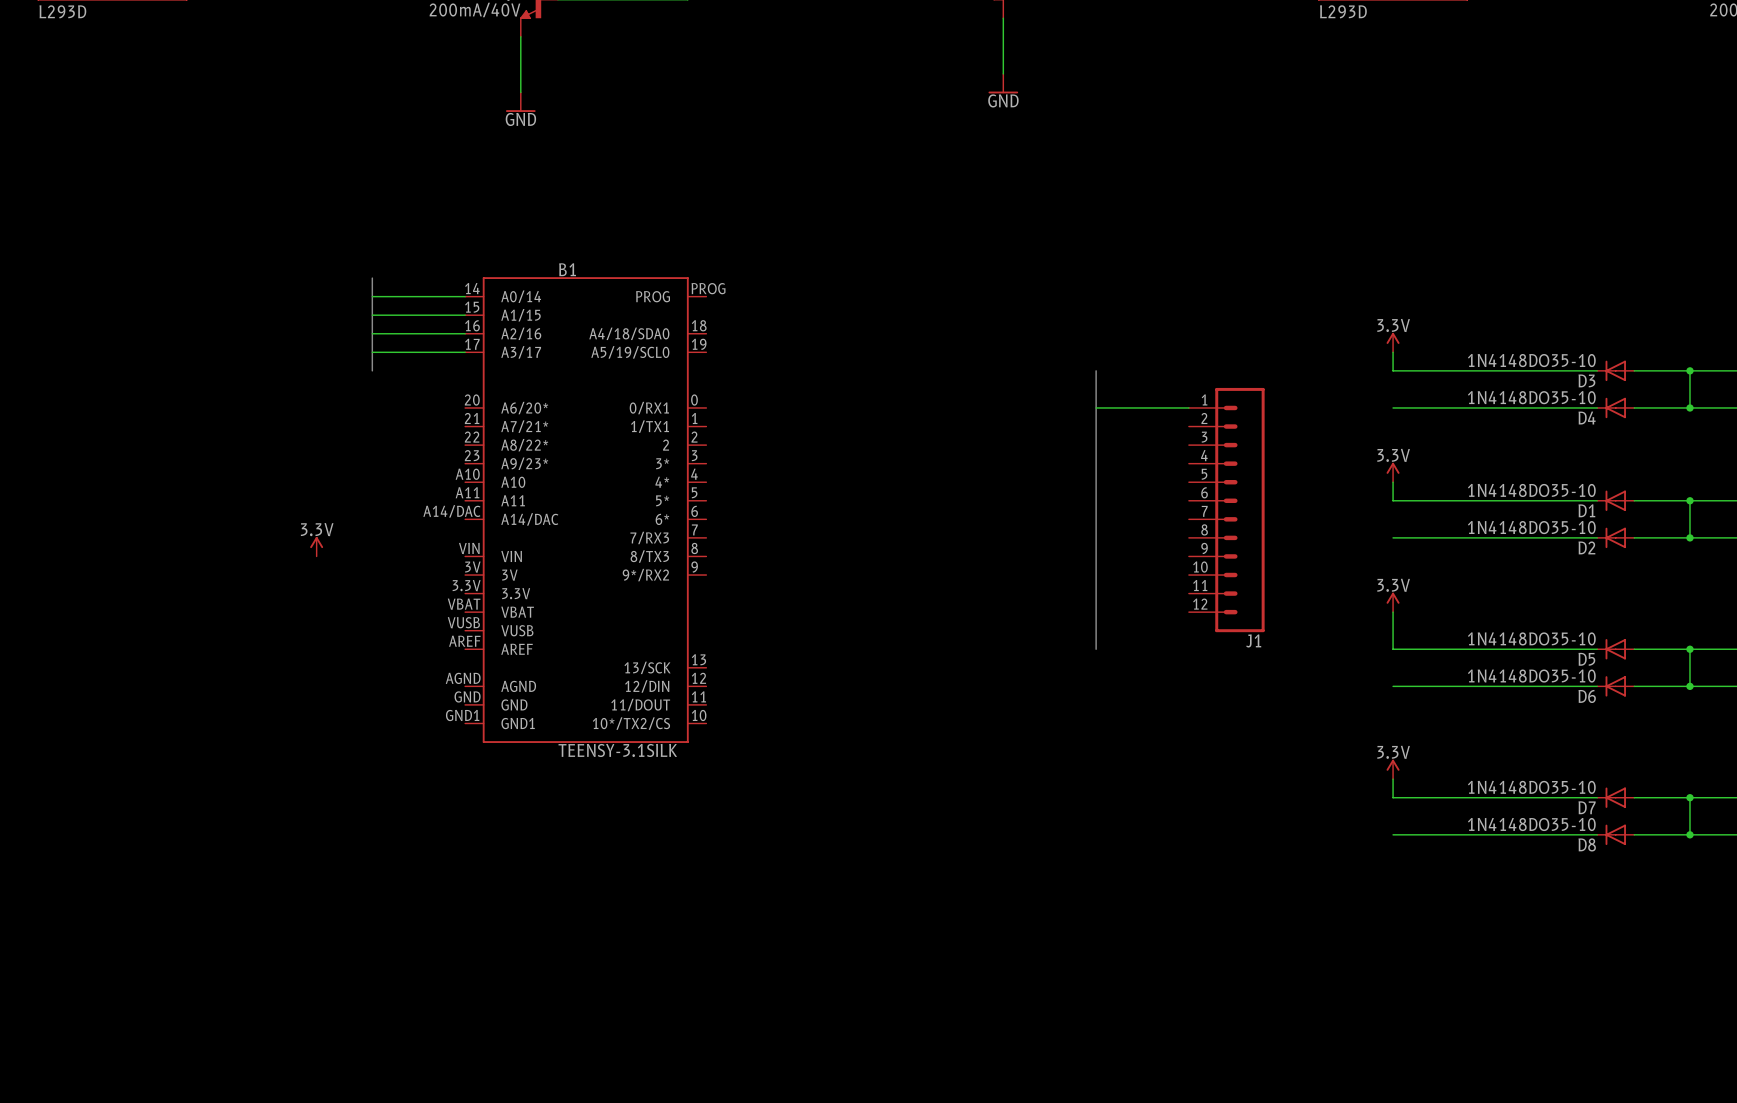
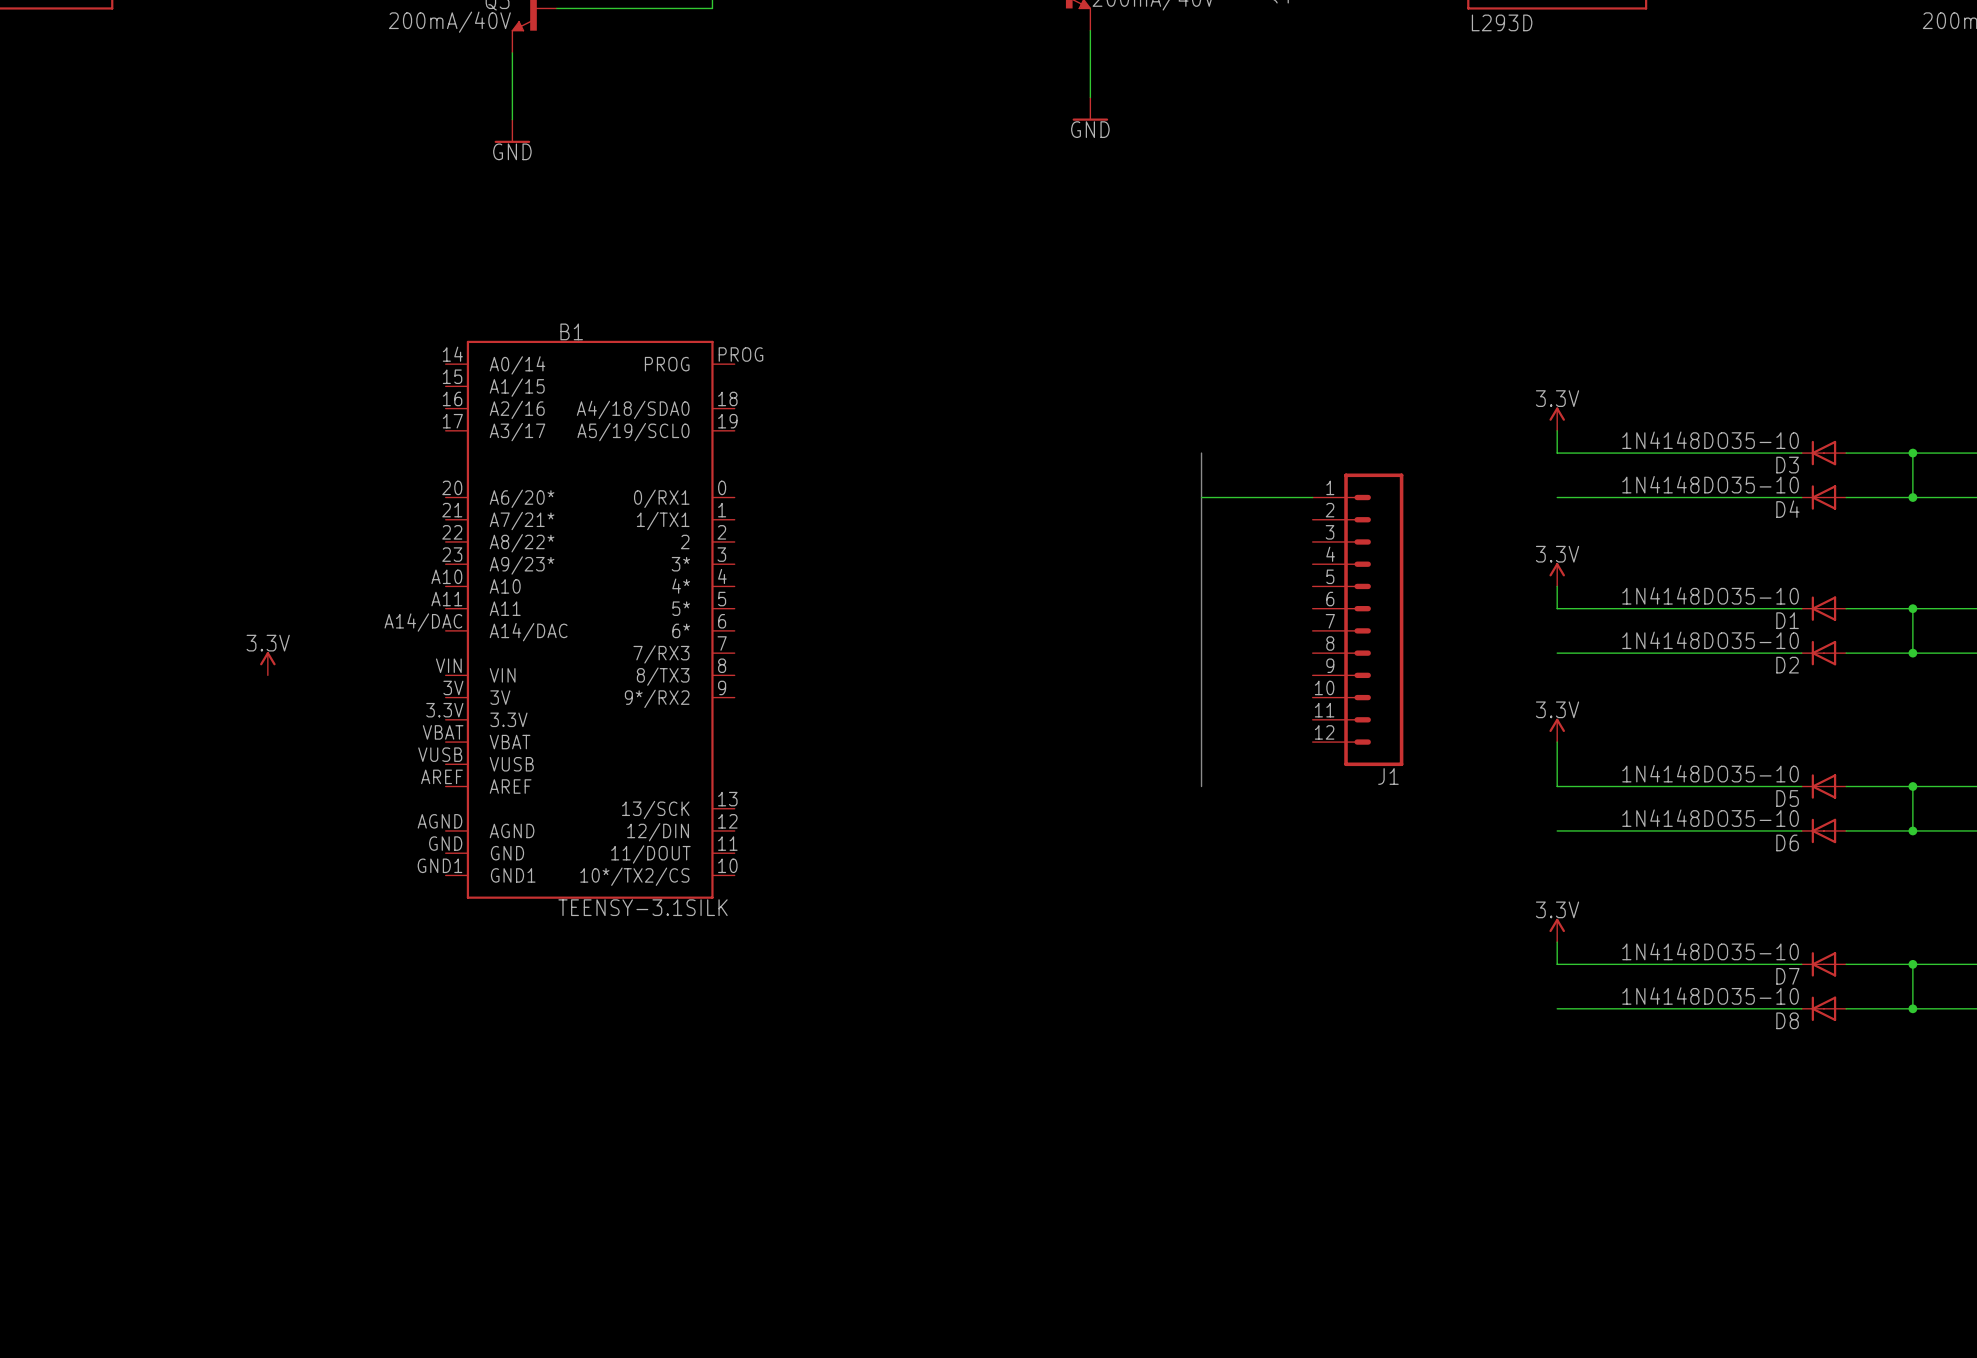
bus: (372, 278) (372, 370) -> none
wire: (372, 296) (465, 296) -> none
wire: (372, 315) (465, 315) -> none
wire: (372, 333) (465, 333) -> none
wire: (372, 352) (465, 352) -> none

